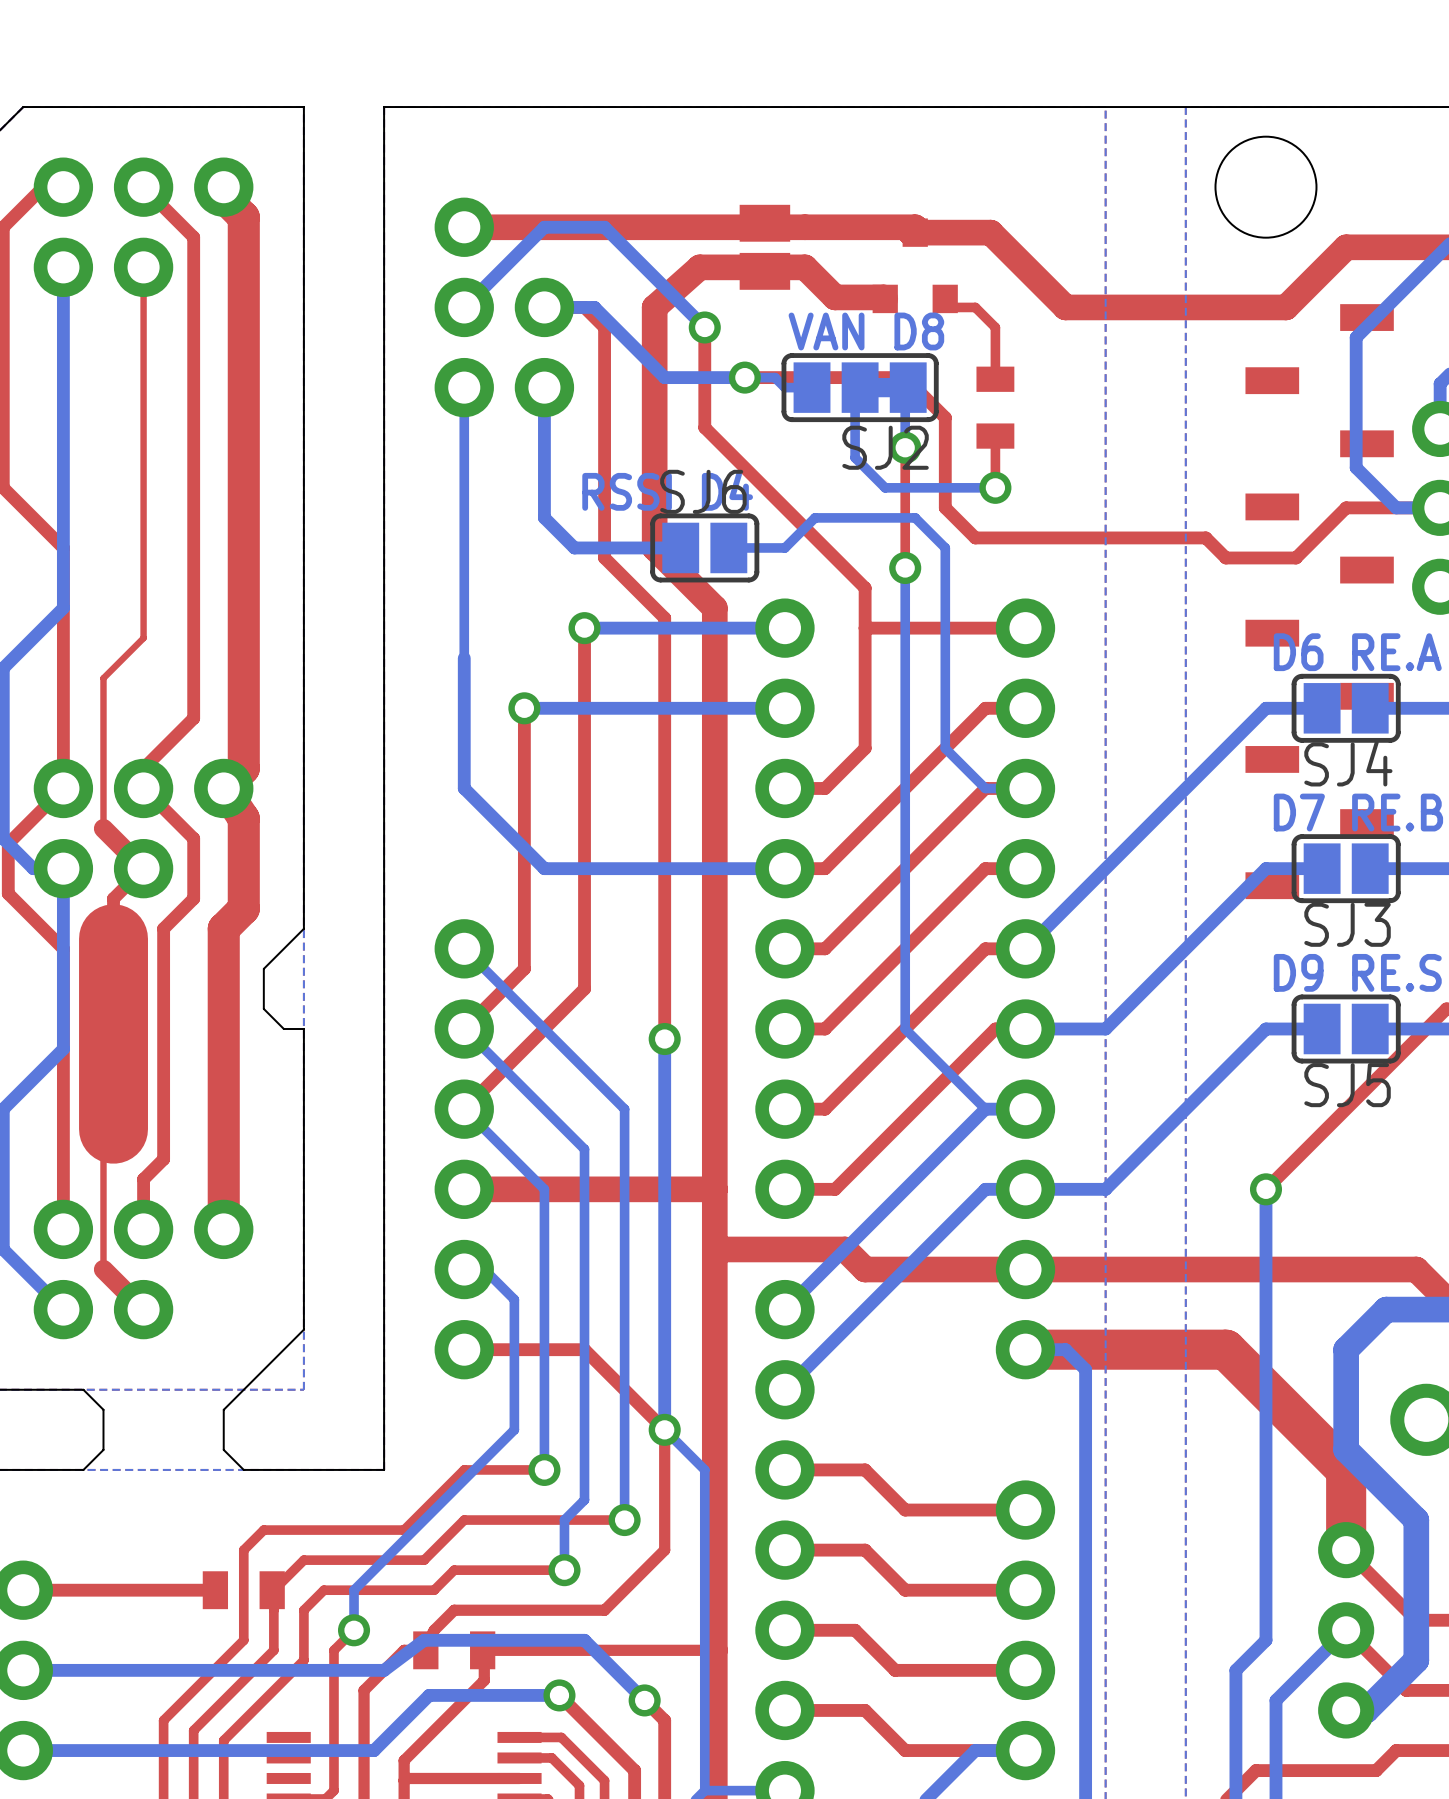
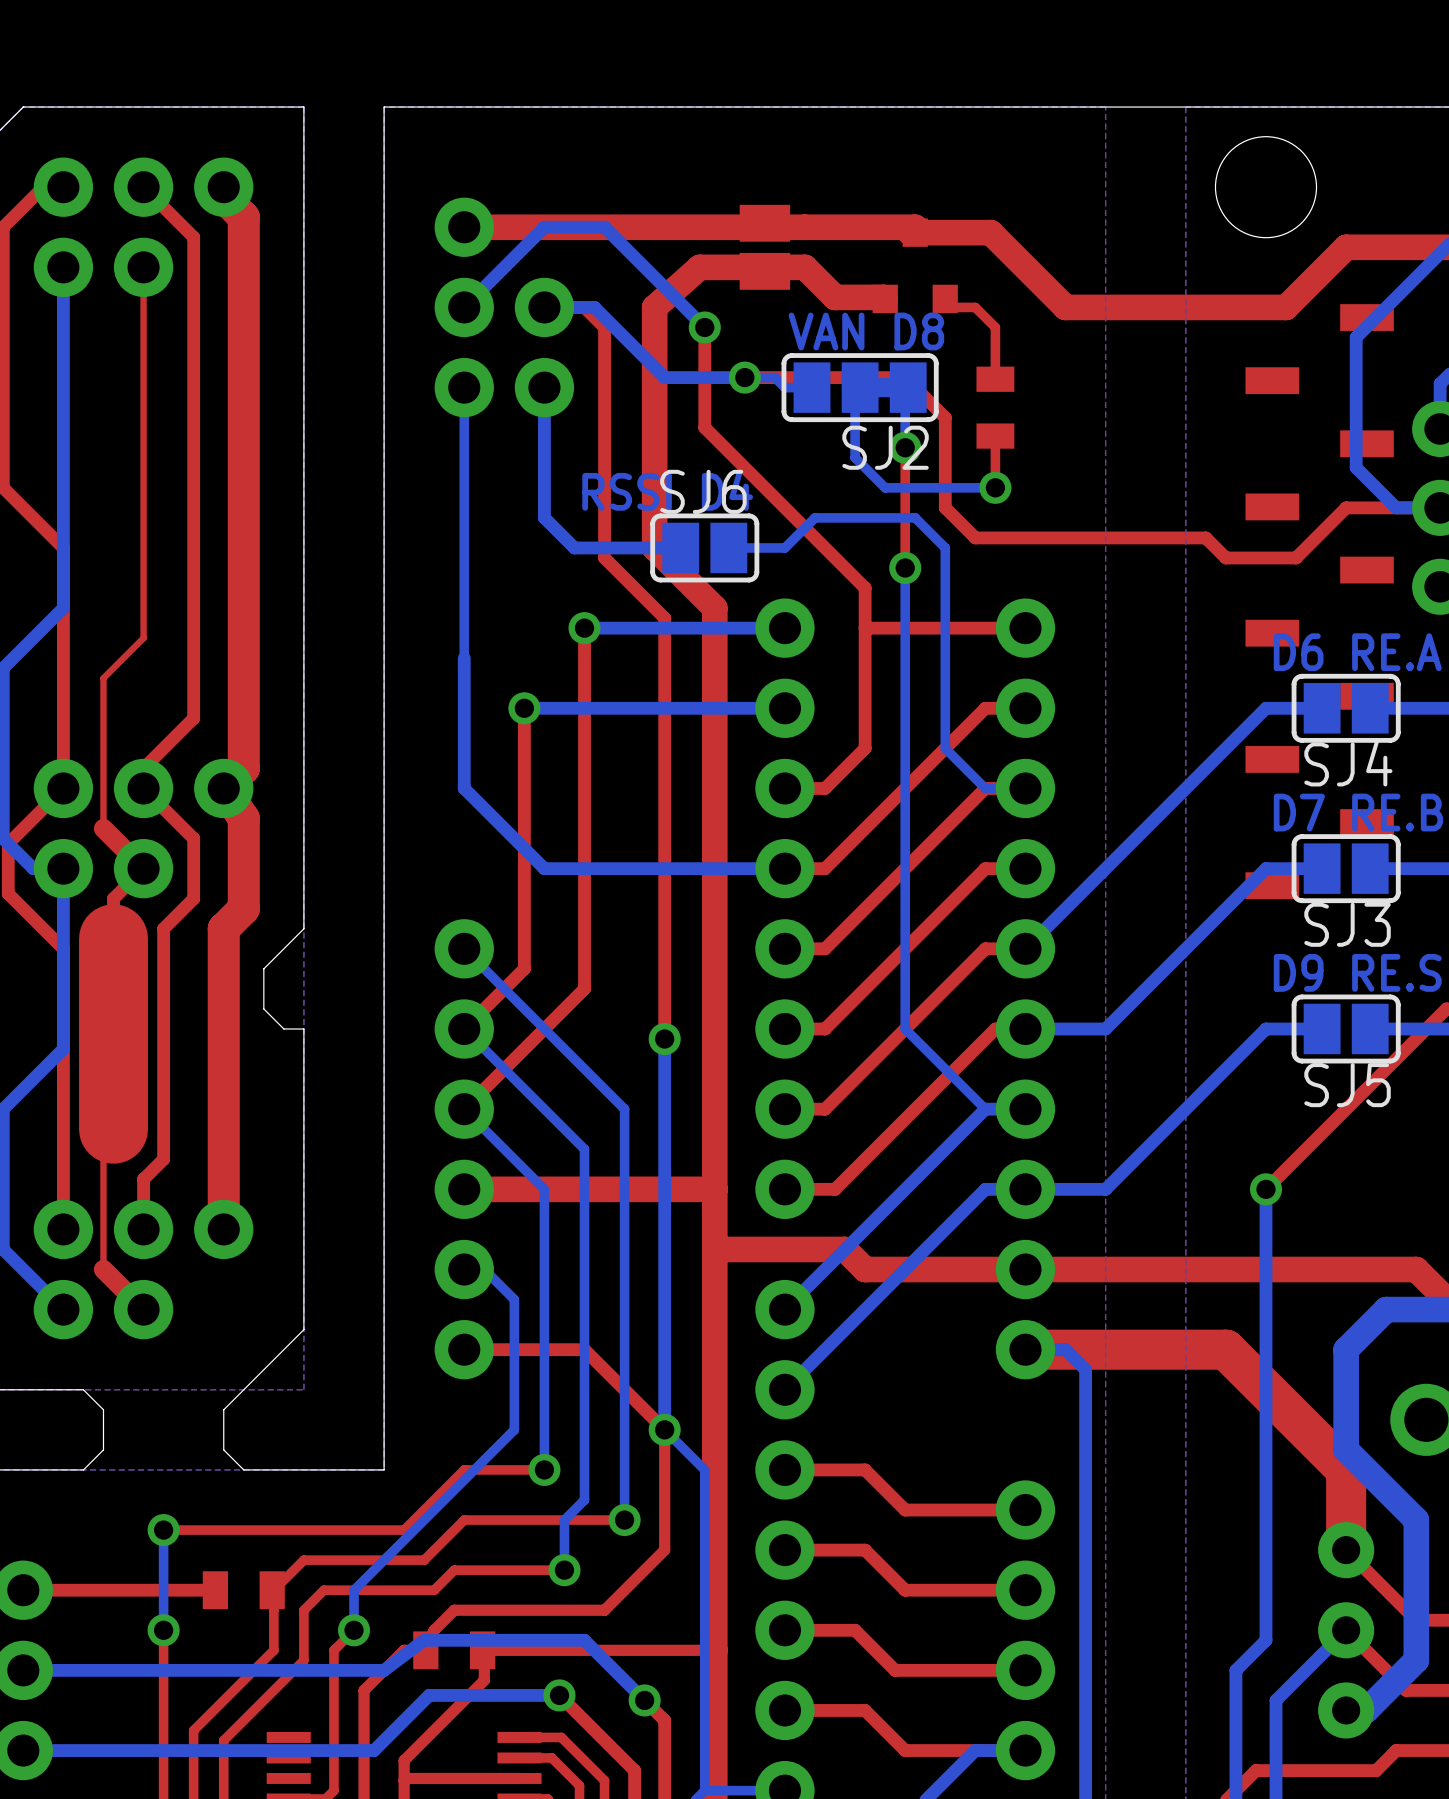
bottom track: none -> (163, 1530) (163, 1630)
via: none -> (163, 1530)
top track: (263, 1530) (243, 1550) (243, 1640) (163, 1720) -> (163, 1630) (163, 1720)
top track: none -> (263, 1530) (163, 1530)
via: none -> (163, 1630)

